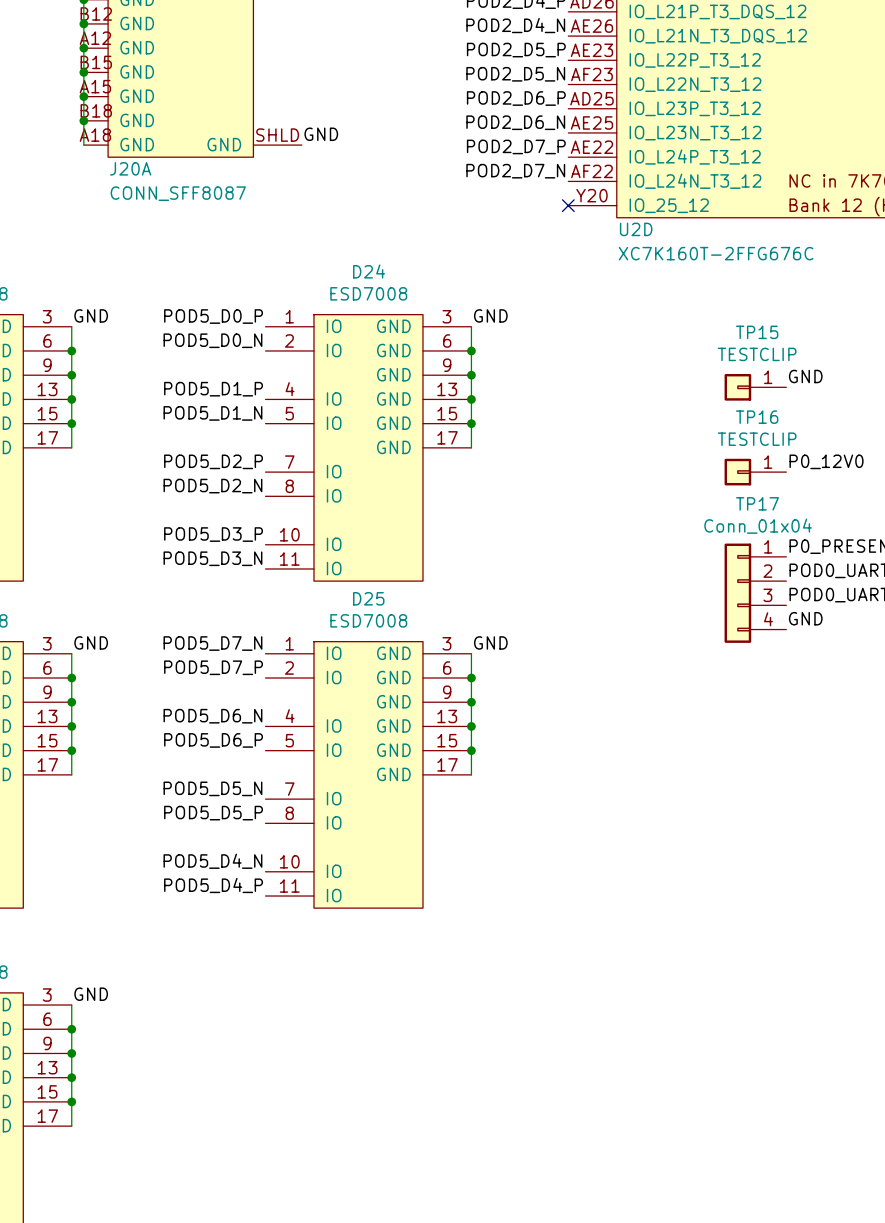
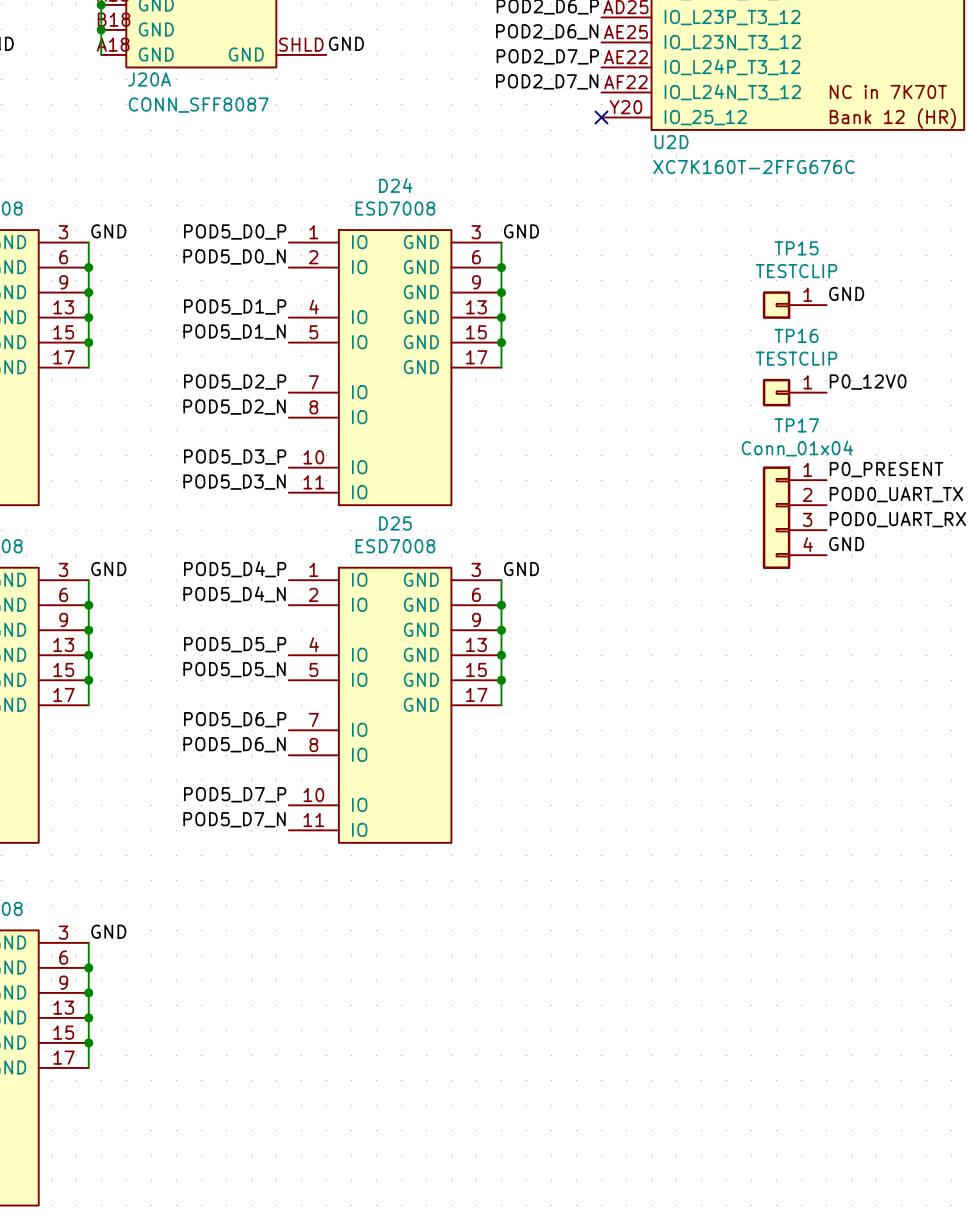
label: POD5_D7_N (212, 643) -> POD5_D4_P (235, 569)
label: POD5_D7_P (213, 667) -> POD5_D4_N (234, 594)
label: POD5_D6_N (212, 716) -> POD5_D5_P (235, 644)
label: POD5_D6_P (213, 740) -> POD5_D5_N (234, 669)
label: POD5_D5_N (212, 788) -> POD5_D6_P (235, 719)
label: POD5_D5_P (213, 813) -> POD5_D6_N (234, 744)
label: POD5_D4_N (212, 861) -> POD5_D7_P (235, 794)
label: POD5_D4_P (213, 885) -> POD5_D7_N (234, 819)

